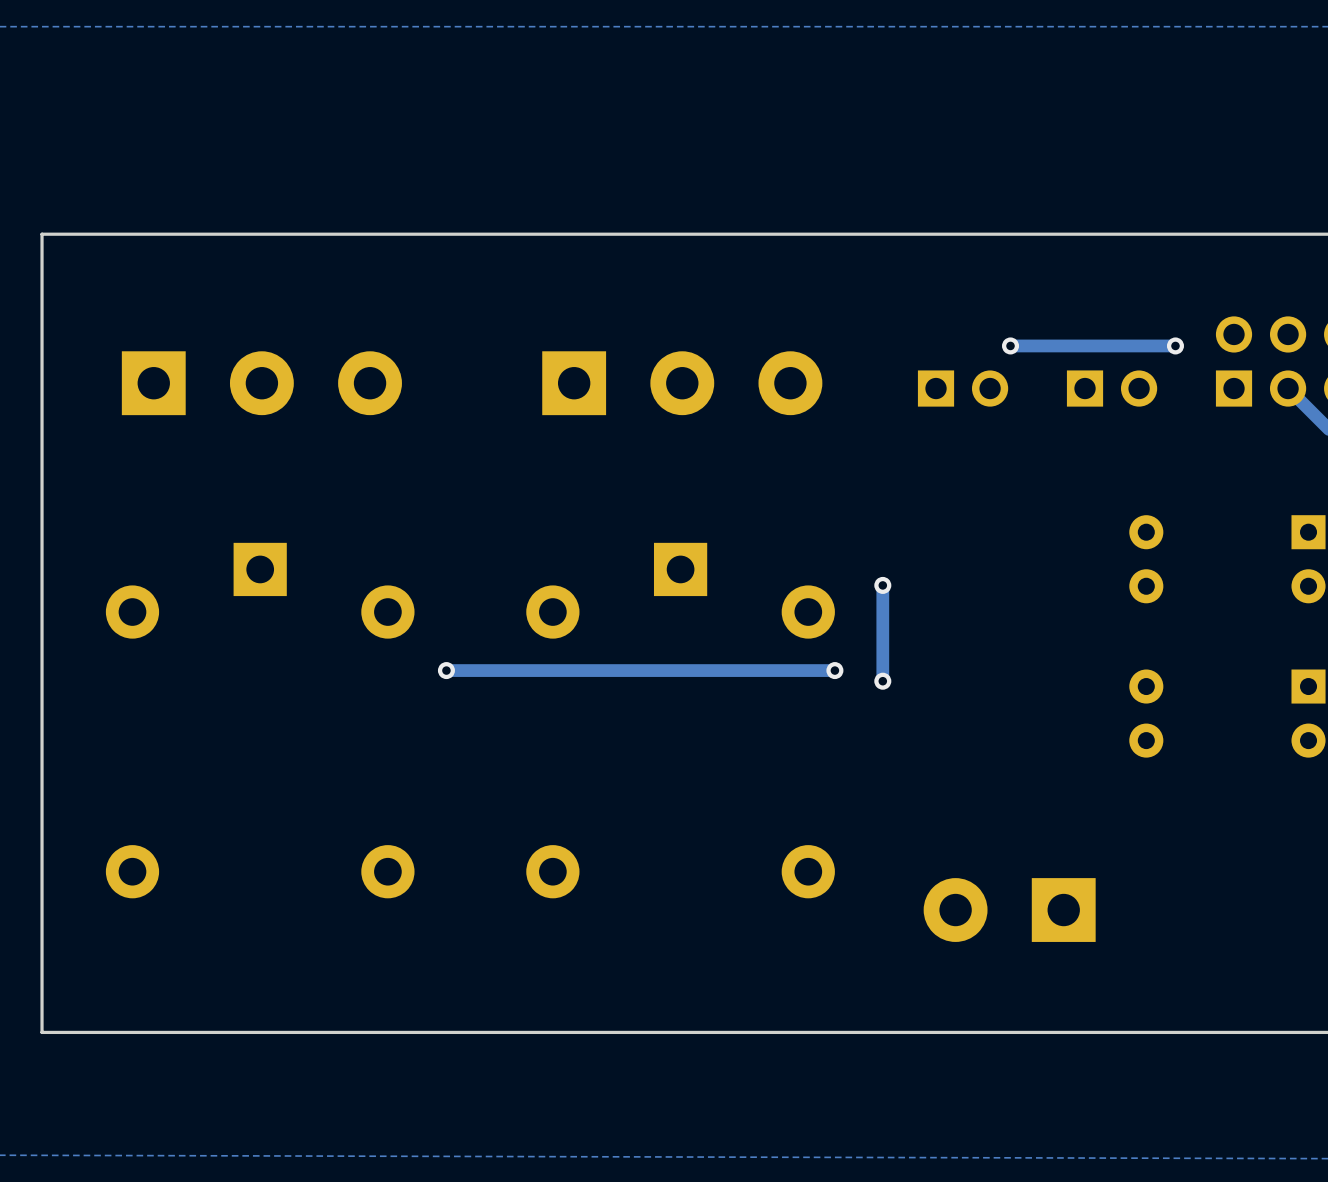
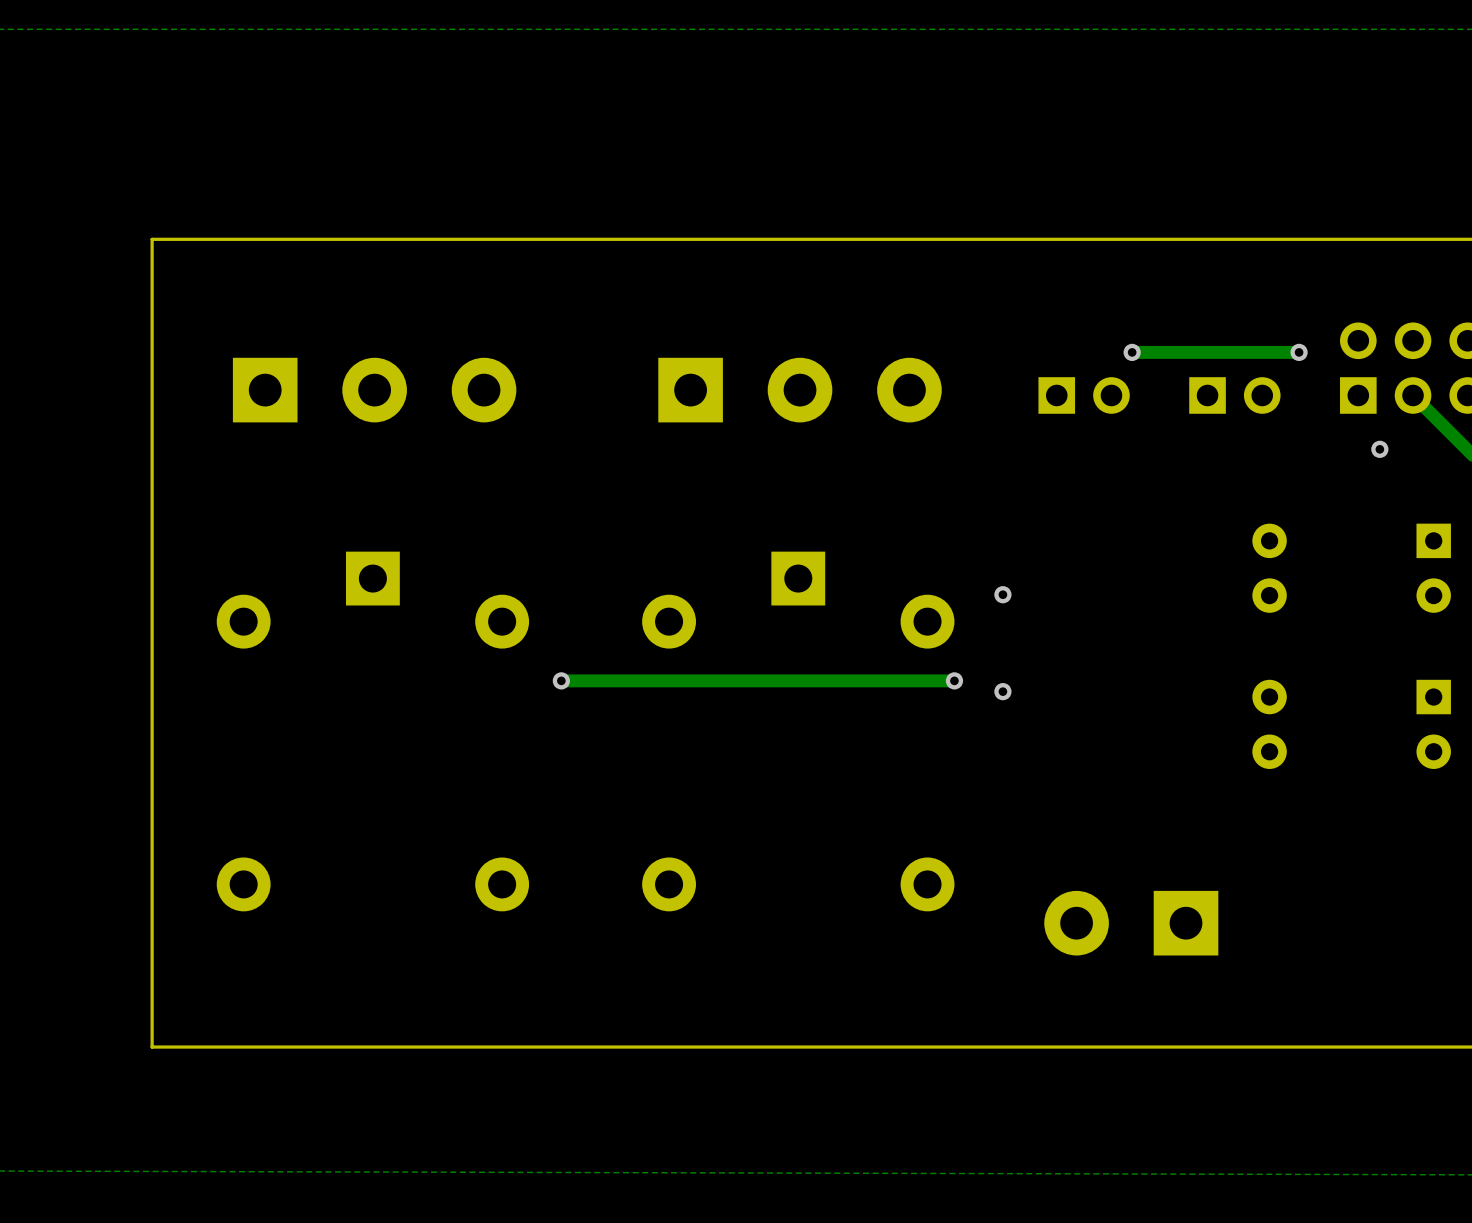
via: none -> (1379, 449)
track: (882, 585) (882, 681) -> none

